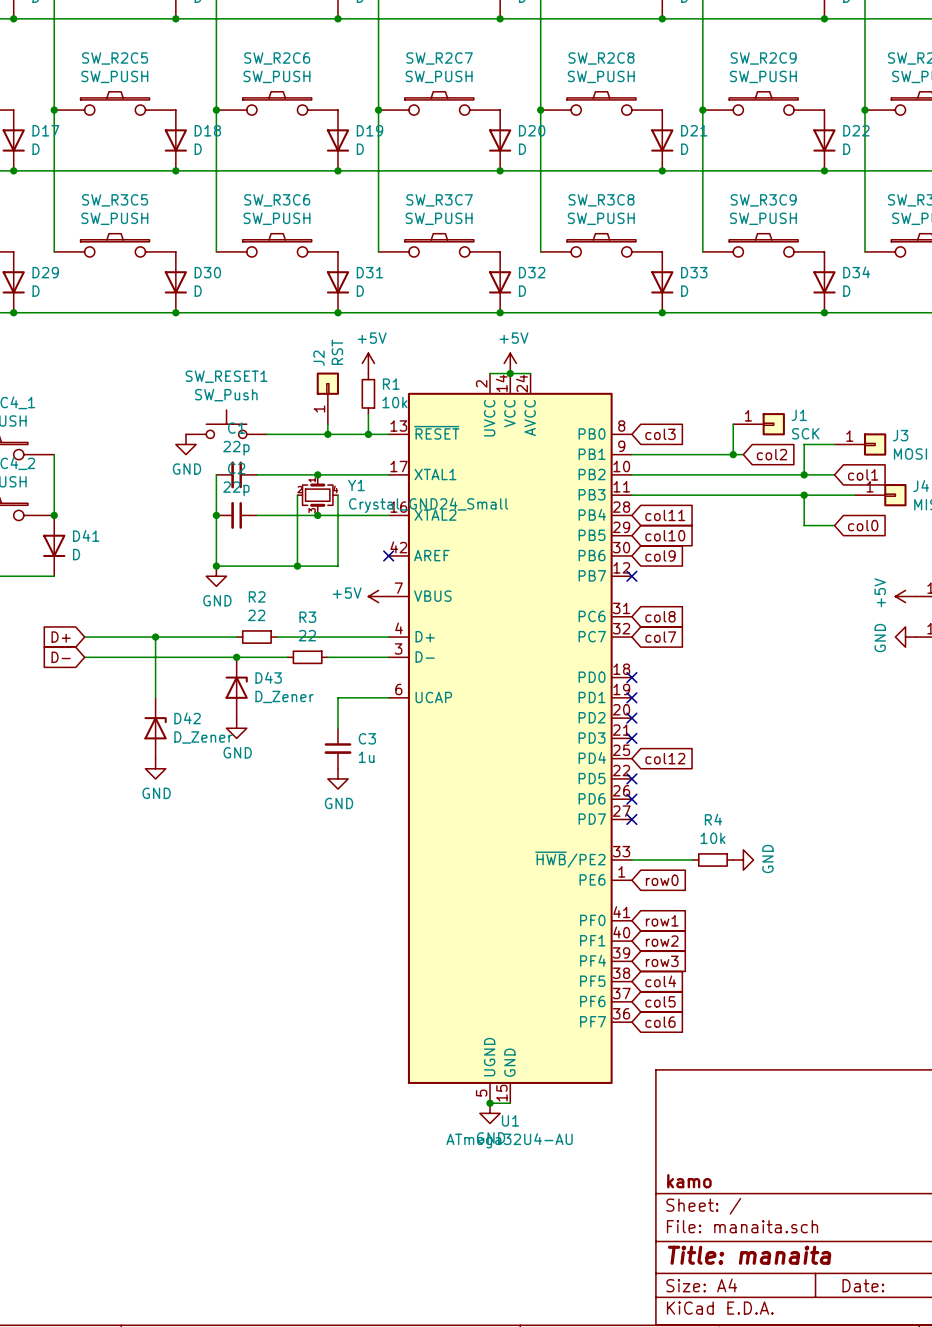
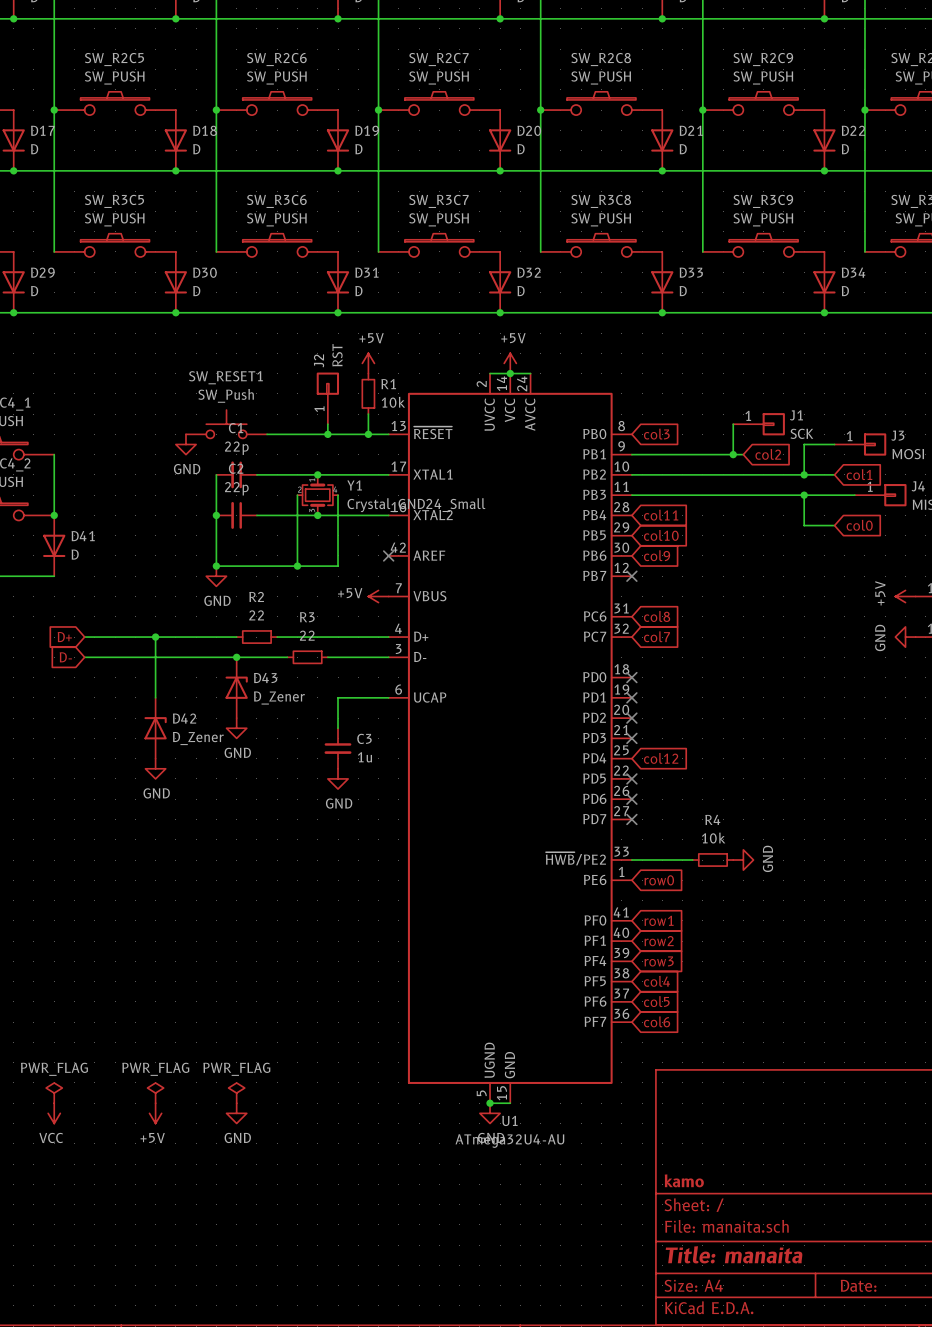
power symbol: none -> PWR_FLAG (54, 1093)
power symbol: none -> PWR_FLAG (155, 1093)
power symbol: none -> PWR_FLAG (236, 1093)
power symbol: none -> VCC (54, 1113)
power symbol: none -> +5V (155, 1113)
power symbol: none -> GND (236, 1113)

